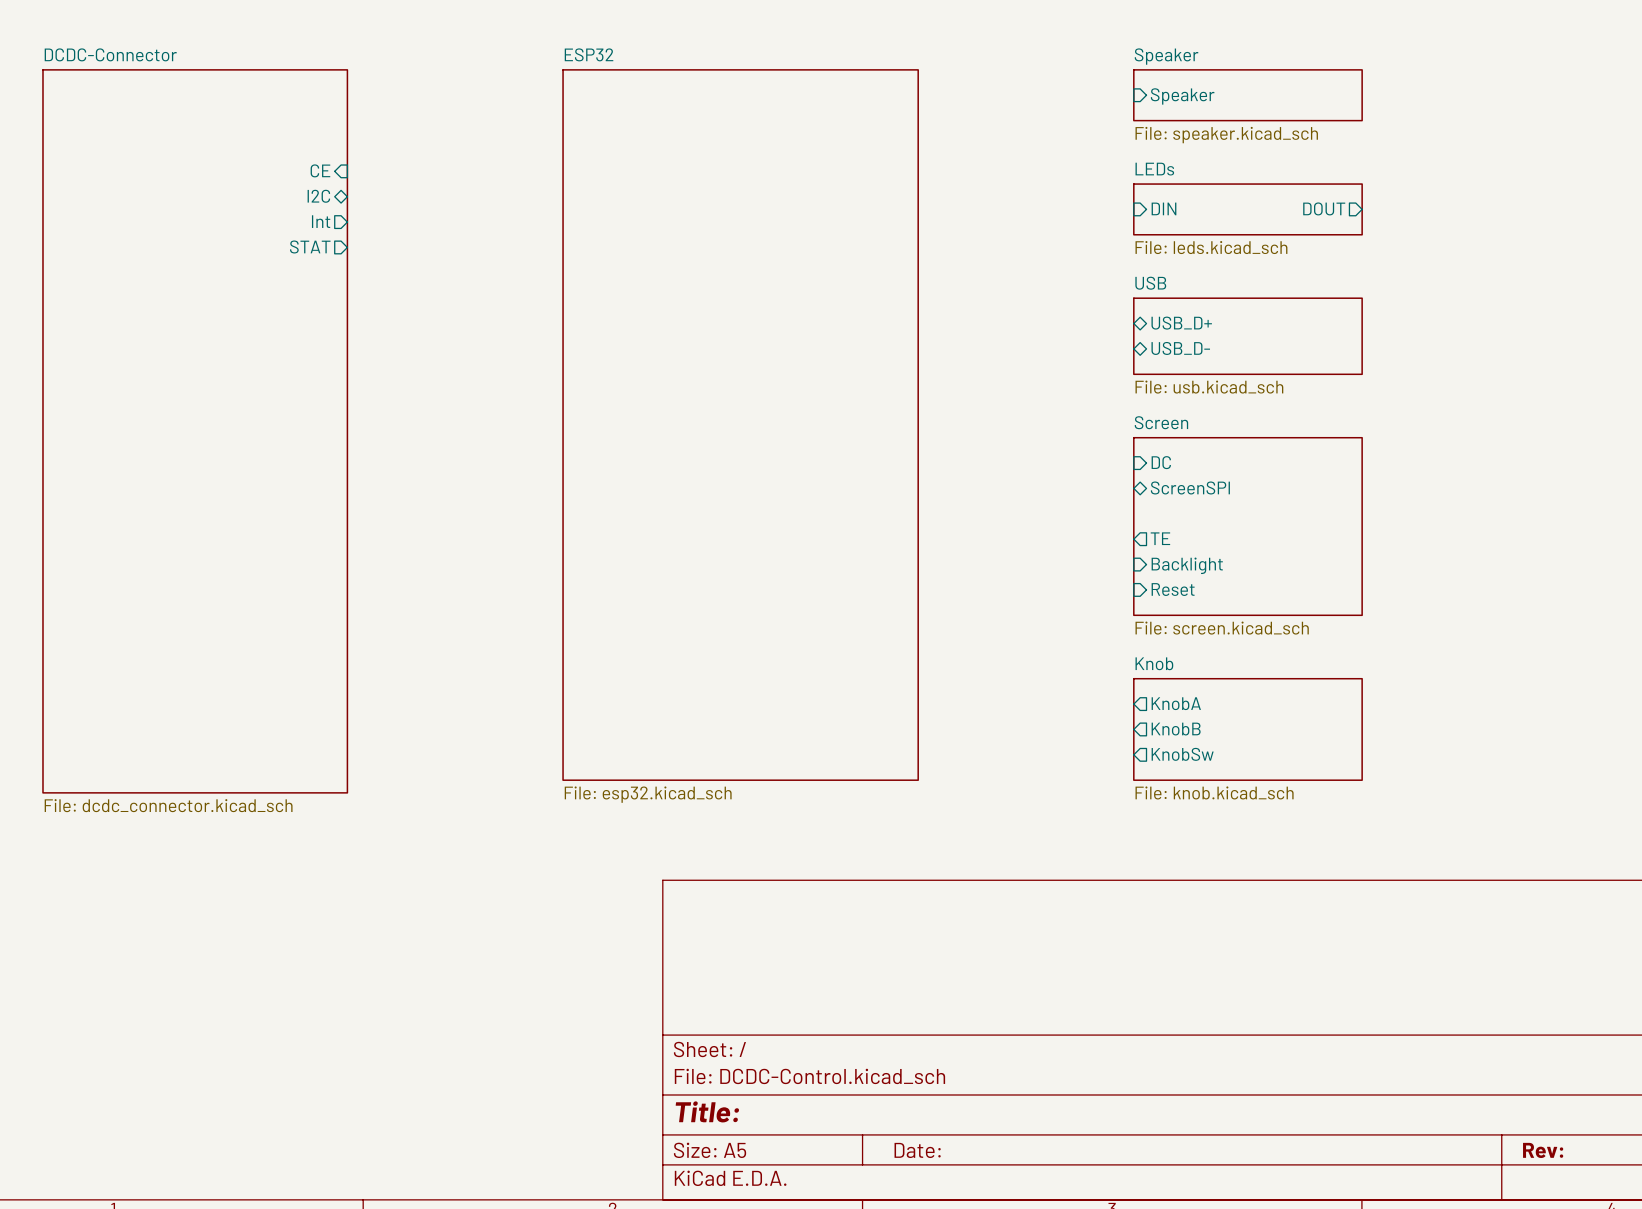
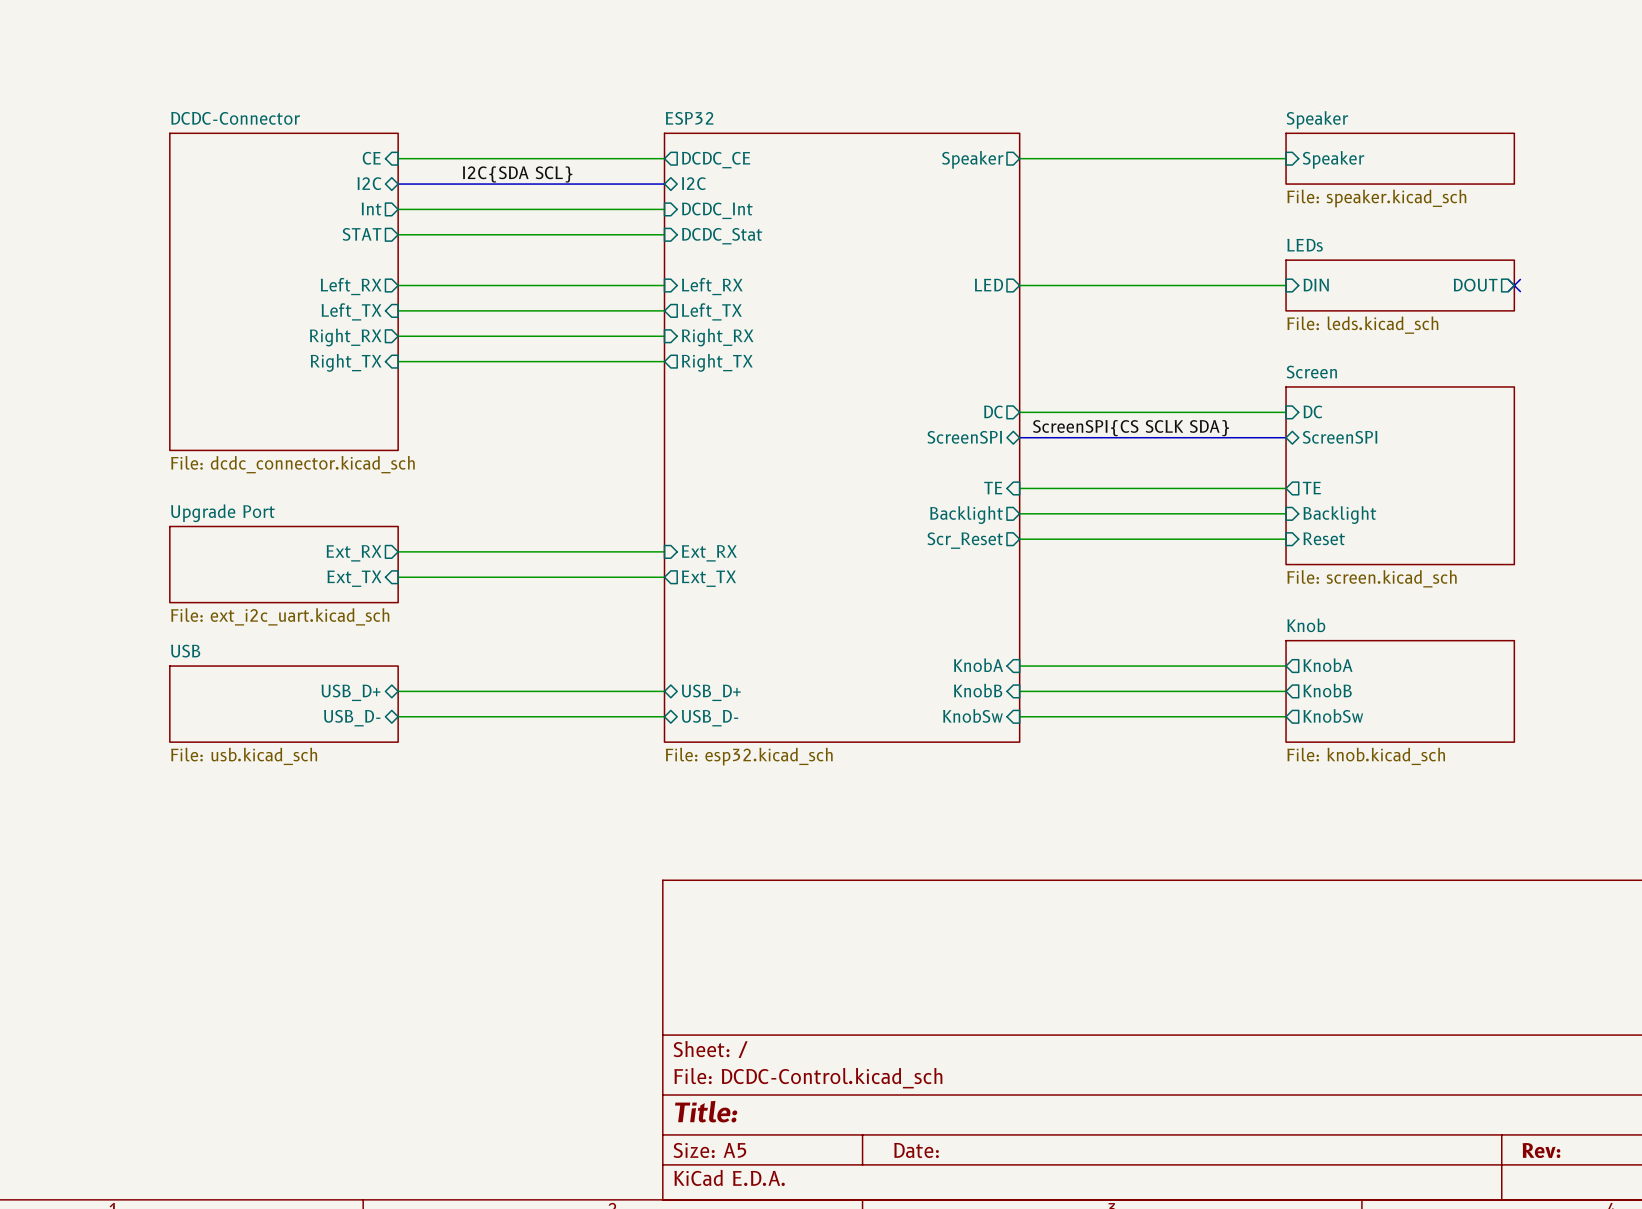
sheet ESP32 name position: ESP32 (589, 54) -> ESP32 (689, 118)
sheet ESP32 shape: [562, 69, 919, 781] -> [663, 132, 1021, 743]
sheet Speaker position: (1247, 95) -> (1400, 158)
sheet pin: Speaker (1182, 96) -> none
wire: none -> (398, 158) (664, 158)
sheet pin: none -> DCDC_CE (716, 160)
wire: none -> (1019, 158) (1286, 158)
sheet pin: none -> Speaker (972, 159)
sheet pin: none -> Speaker (1333, 159)
sheet pin position: CE (320, 170) -> CE (371, 158)
label: none -> I2C{SDA SCL} (517, 174)
sheet pin: none -> I2C (693, 183)
bus: none -> (398, 184) (664, 184)
sheet pin position: I2C (318, 196) -> I2C (369, 183)
sheet pin: none -> DCDC_Int (717, 210)
sheet pin position: DIN (1164, 208) -> DIN (1316, 285)
sheet pin position: DOUT (1324, 208) -> DOUT (1475, 285)
wire: none -> (398, 209) (664, 209)
sheet LEDs position: (1247, 209) -> (1400, 285)
sheet pin position: Int (321, 221) -> Int (371, 209)
wire: none -> (398, 234) (664, 234)
sheet pin: none -> DCDC_Stat (722, 236)
sheet pin position: STAT (310, 246) -> STAT (361, 234)
sheet pin: none -> Left_RX (351, 286)
wire: none -> (398, 285) (664, 285)
sheet pin: none -> Left_RX (712, 286)
sheet pin: none -> LED (988, 285)
wire: none -> (1019, 285) (1286, 285)
no-connect mark: none -> (1514, 285)
sheet DCDC-Connector: none -> File: dcdc_connector.kicad_sch (283, 291)
sheet pin: none -> Left_TX (351, 311)
wire: none -> (398, 310) (664, 310)
sheet pin: none -> Left_TX (711, 311)
sheet pin: USB_D+ (1181, 323) -> none
wire: none -> (398, 336) (664, 336)
sheet USB: File: usb.kicad_sch (1247, 336) -> none
sheet pin: none -> Right_RX (345, 337)
sheet pin: none -> Right_RX (717, 337)
sheet pin: USB_D- (1180, 348) -> none
wire: none -> (398, 361) (664, 361)
sheet pin: none -> Right_TX (346, 362)
sheet pin: none -> Right_TX (717, 362)
sheet pin: none -> DC (993, 411)
sheet pin: none -> DC (1312, 411)
wire: none -> (1019, 412) (1286, 412)
label: none -> ScreenSPI{CS SCLK SDA} (1131, 428)
sheet DCDC-Connector: File: dcdc_connector.kicad_sch (195, 431) -> none
sheet pin: none -> ScreenSPI (964, 437)
bus: none -> (1019, 437) (1286, 437)
sheet pin: none -> ScreenSPI (1340, 437)
sheet pin: DC (1161, 462) -> none
sheet pin: none -> TE (993, 488)
sheet pin: ScreenSPI (1190, 487) -> none
sheet pin: none -> TE (1311, 488)
wire: none -> (1019, 488) (1286, 488)
wire: none -> (1019, 513) (1286, 513)
sheet pin: none -> Backlight (966, 515)
sheet pin: none -> Backlight (1339, 515)
sheet Screen position: (1247, 526) -> (1400, 475)
sheet pin: none -> Scr_Reset (965, 540)
sheet pin: TE (1160, 538) -> none
wire: none -> (1019, 539) (1286, 539)
sheet pin: none -> Ext_RX (354, 553)
wire: none -> (398, 551) (664, 551)
sheet pin: none -> Ext_RX (709, 553)
sheet Upgrade Port: none -> File: ext_i2c_uart.kicad_sch (283, 564)
sheet pin: Backlight (1187, 565) -> none
sheet pin: none -> Ext_TX (354, 578)
sheet pin: none -> Ext_TX (708, 578)
wire: none -> (398, 577) (664, 577)
sheet pin position: Reset (1173, 589) -> Reset (1324, 538)
sheet pin: none -> KnobA (978, 665)
sheet pin: none -> KnobA (1327, 665)
wire: none -> (1019, 666) (1286, 666)
sheet pin: none -> USB_D+ (350, 692)
sheet pin: none -> USB_D+ (711, 692)
wire: none -> (398, 691) (664, 691)
sheet pin: none -> KnobB (978, 690)
wire: none -> (1019, 691) (1286, 691)
sheet pin: none -> KnobB (1327, 690)
sheet pin: KnobA (1176, 703) -> none
sheet USB: none -> File: usb.kicad_sch (283, 704)
sheet pin: none -> USB_D- (352, 718)
wire: none -> (398, 716) (664, 716)
sheet pin: none -> USB_D- (710, 718)
sheet pin: none -> KnobSw (972, 715)
wire: none -> (1019, 716) (1286, 716)
sheet pin: none -> KnobSw (1333, 715)
sheet pin: KnobB (1176, 729) -> none
sheet Knob position: (1247, 729) -> (1400, 691)
sheet pin: KnobSw (1182, 754) -> none
sheet ESP32 value position: File: esp32.kicad_sch (648, 794) -> File: esp32.kicad_sch (749, 756)

